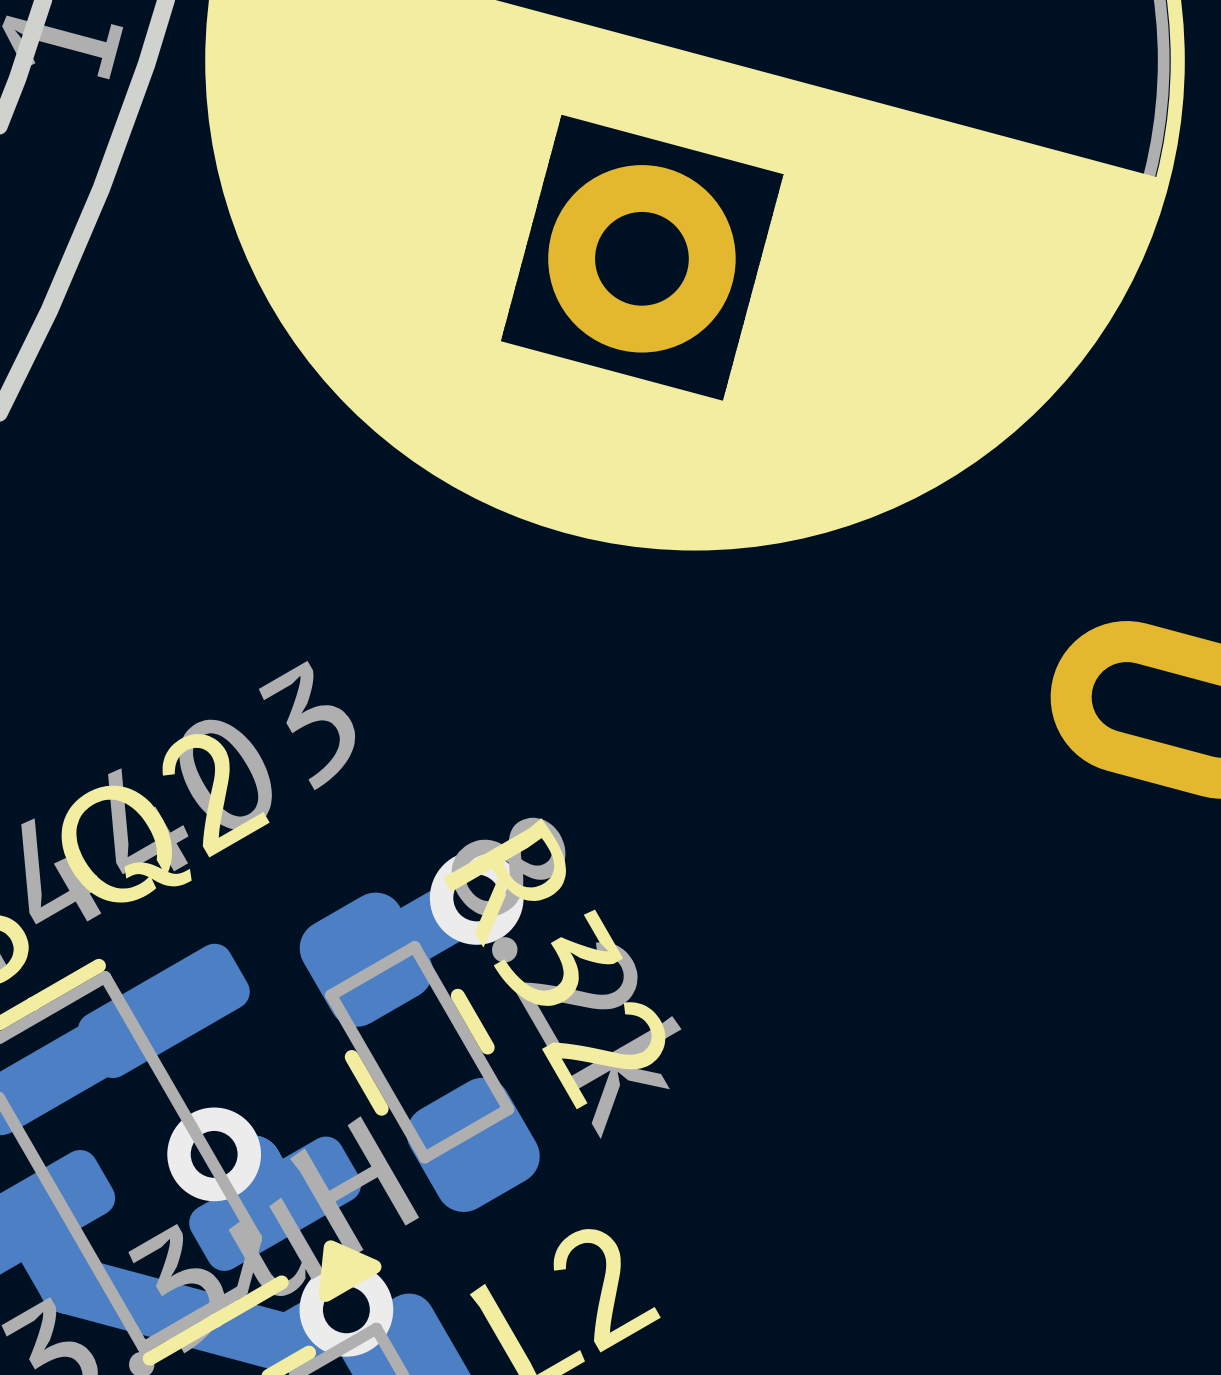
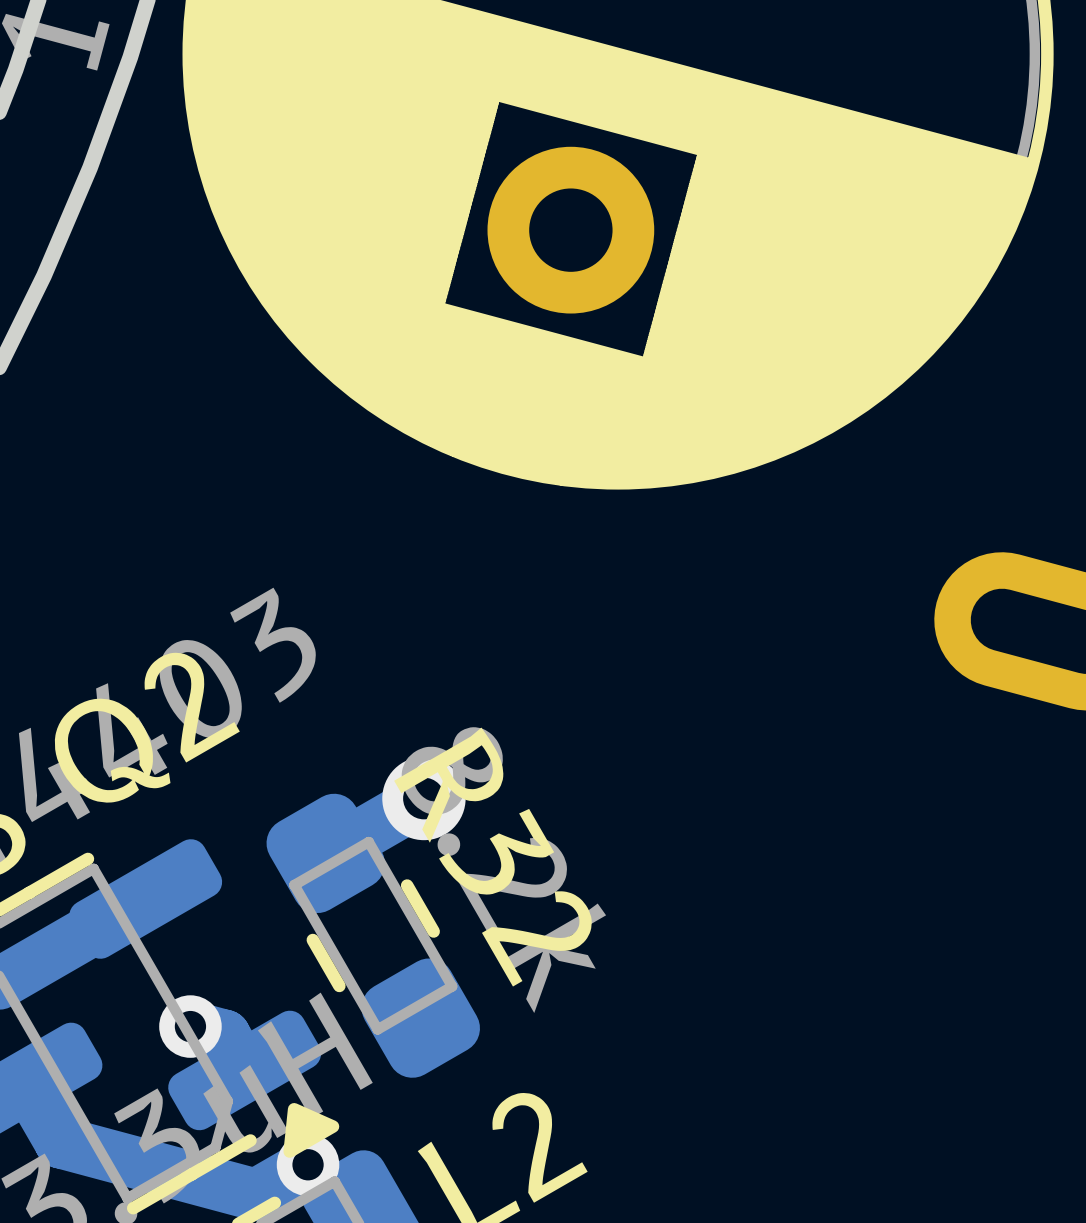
via size: [167, 1107, 262, 1202] -> [159, 995, 222, 1058]
via size: [299, 1262, 394, 1357] -> [276, 1133, 340, 1197]

